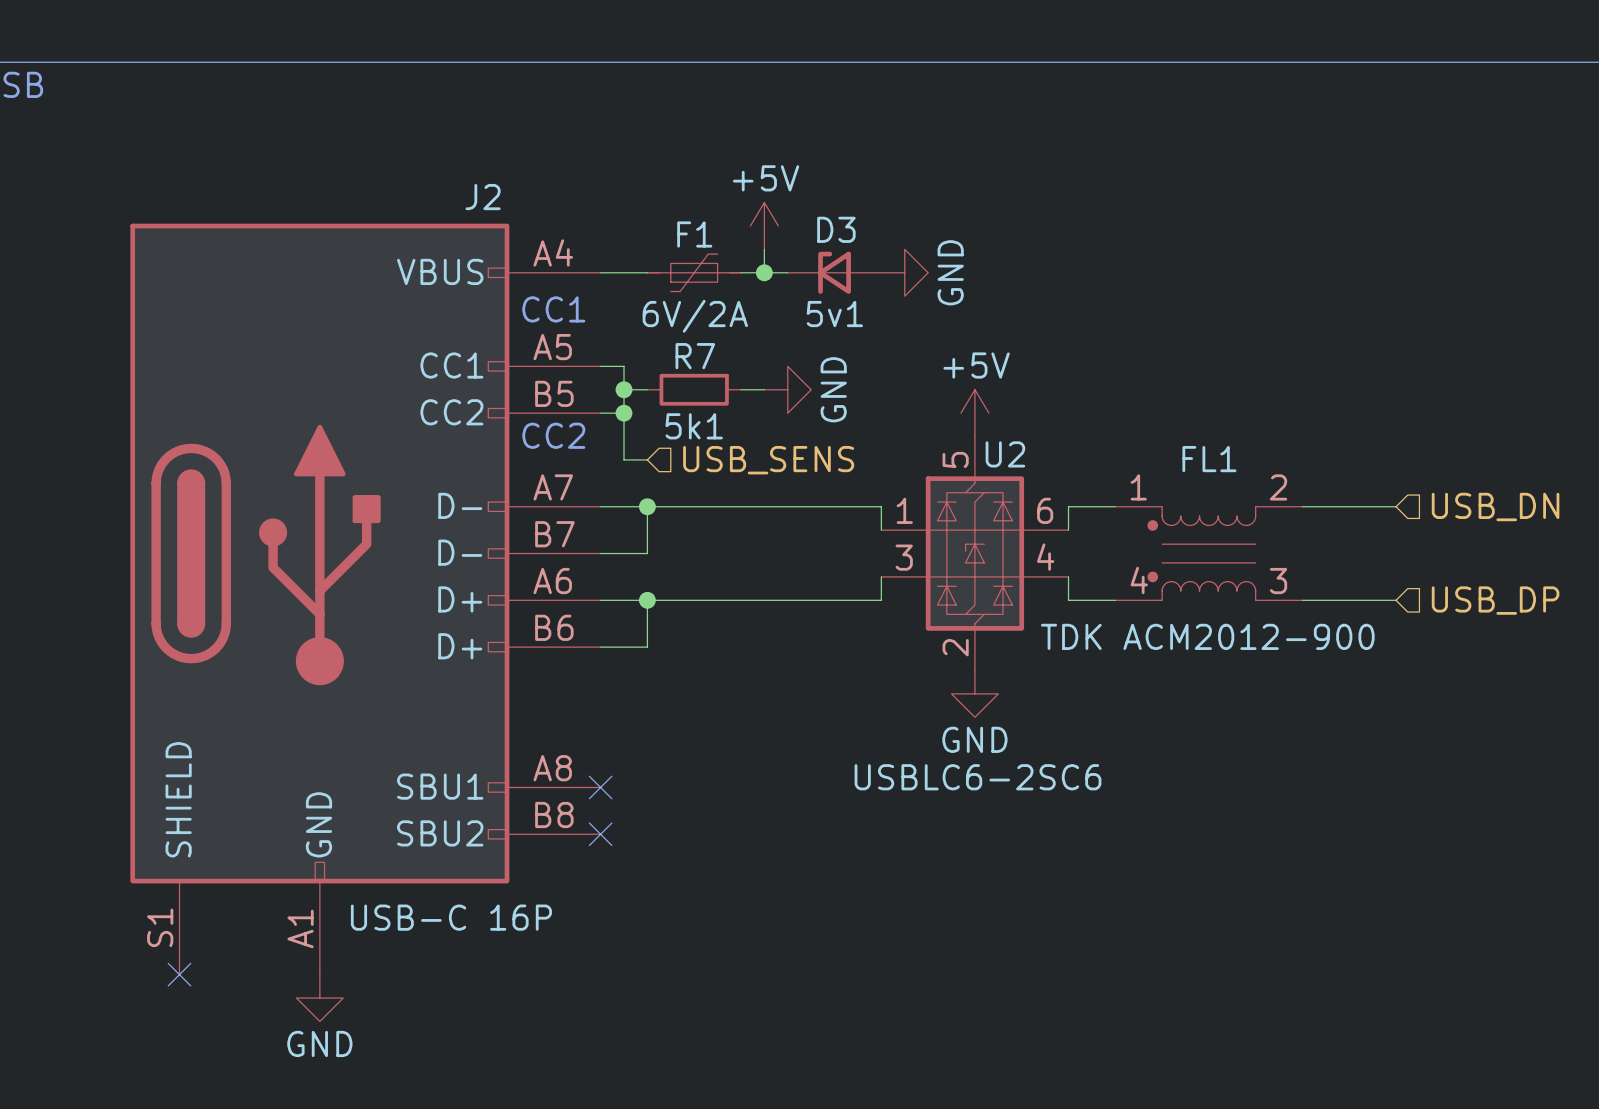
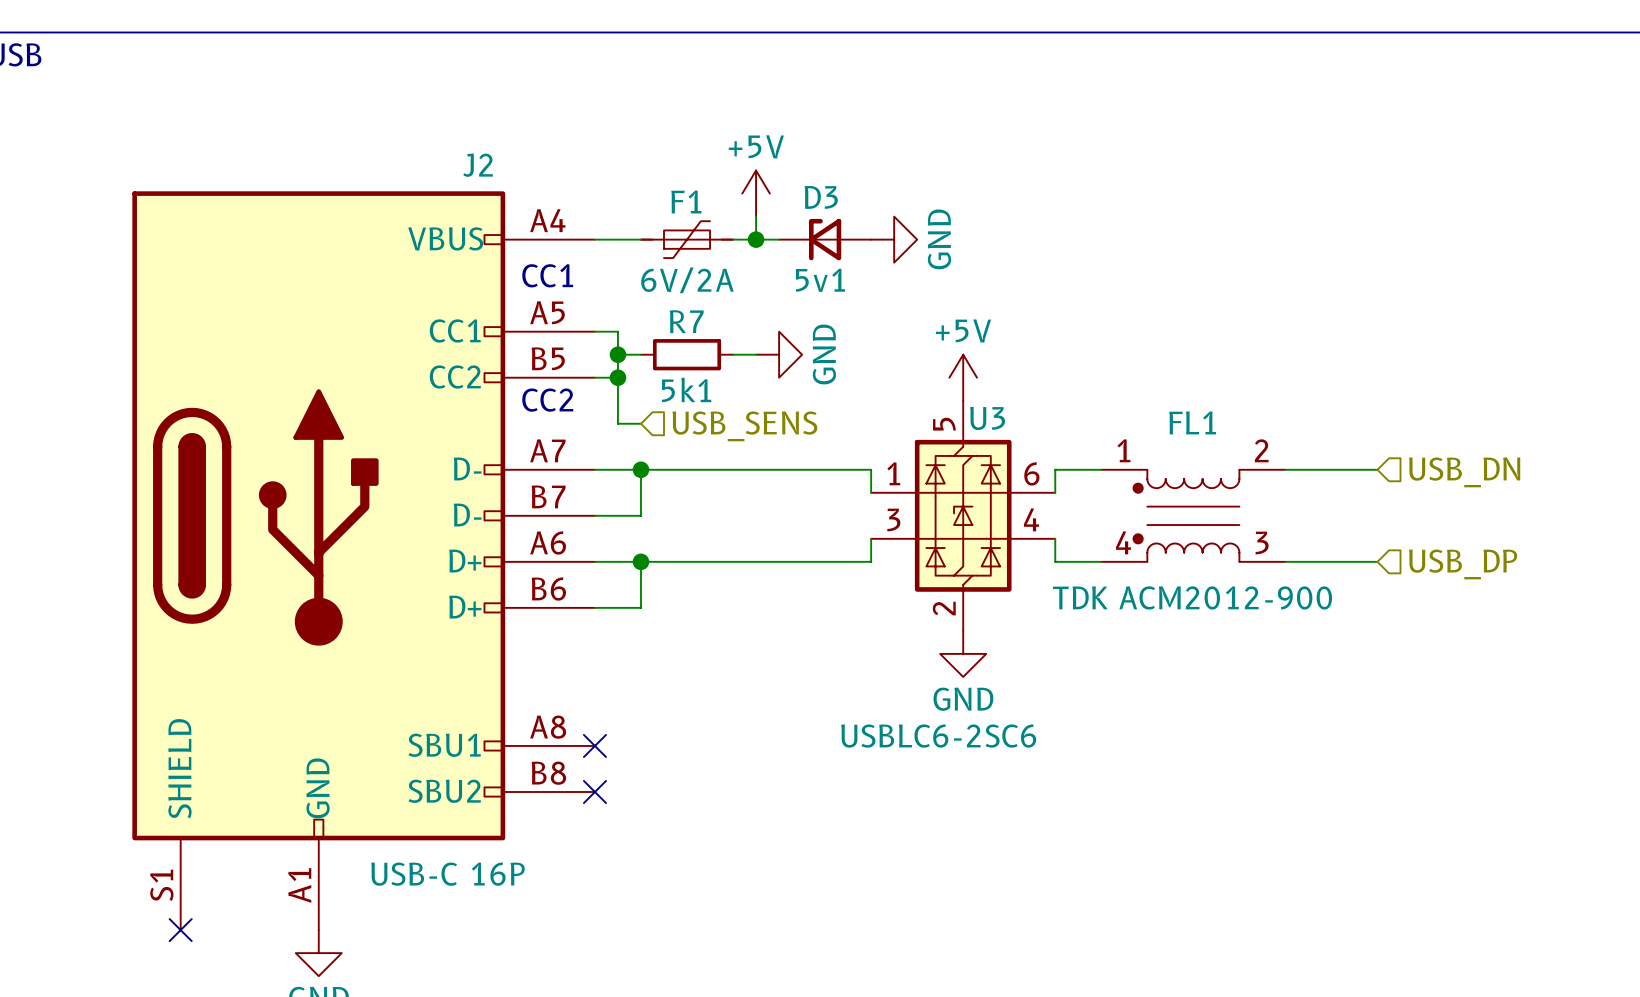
U2 name: U2 (1005, 454) -> U3 (987, 418)

